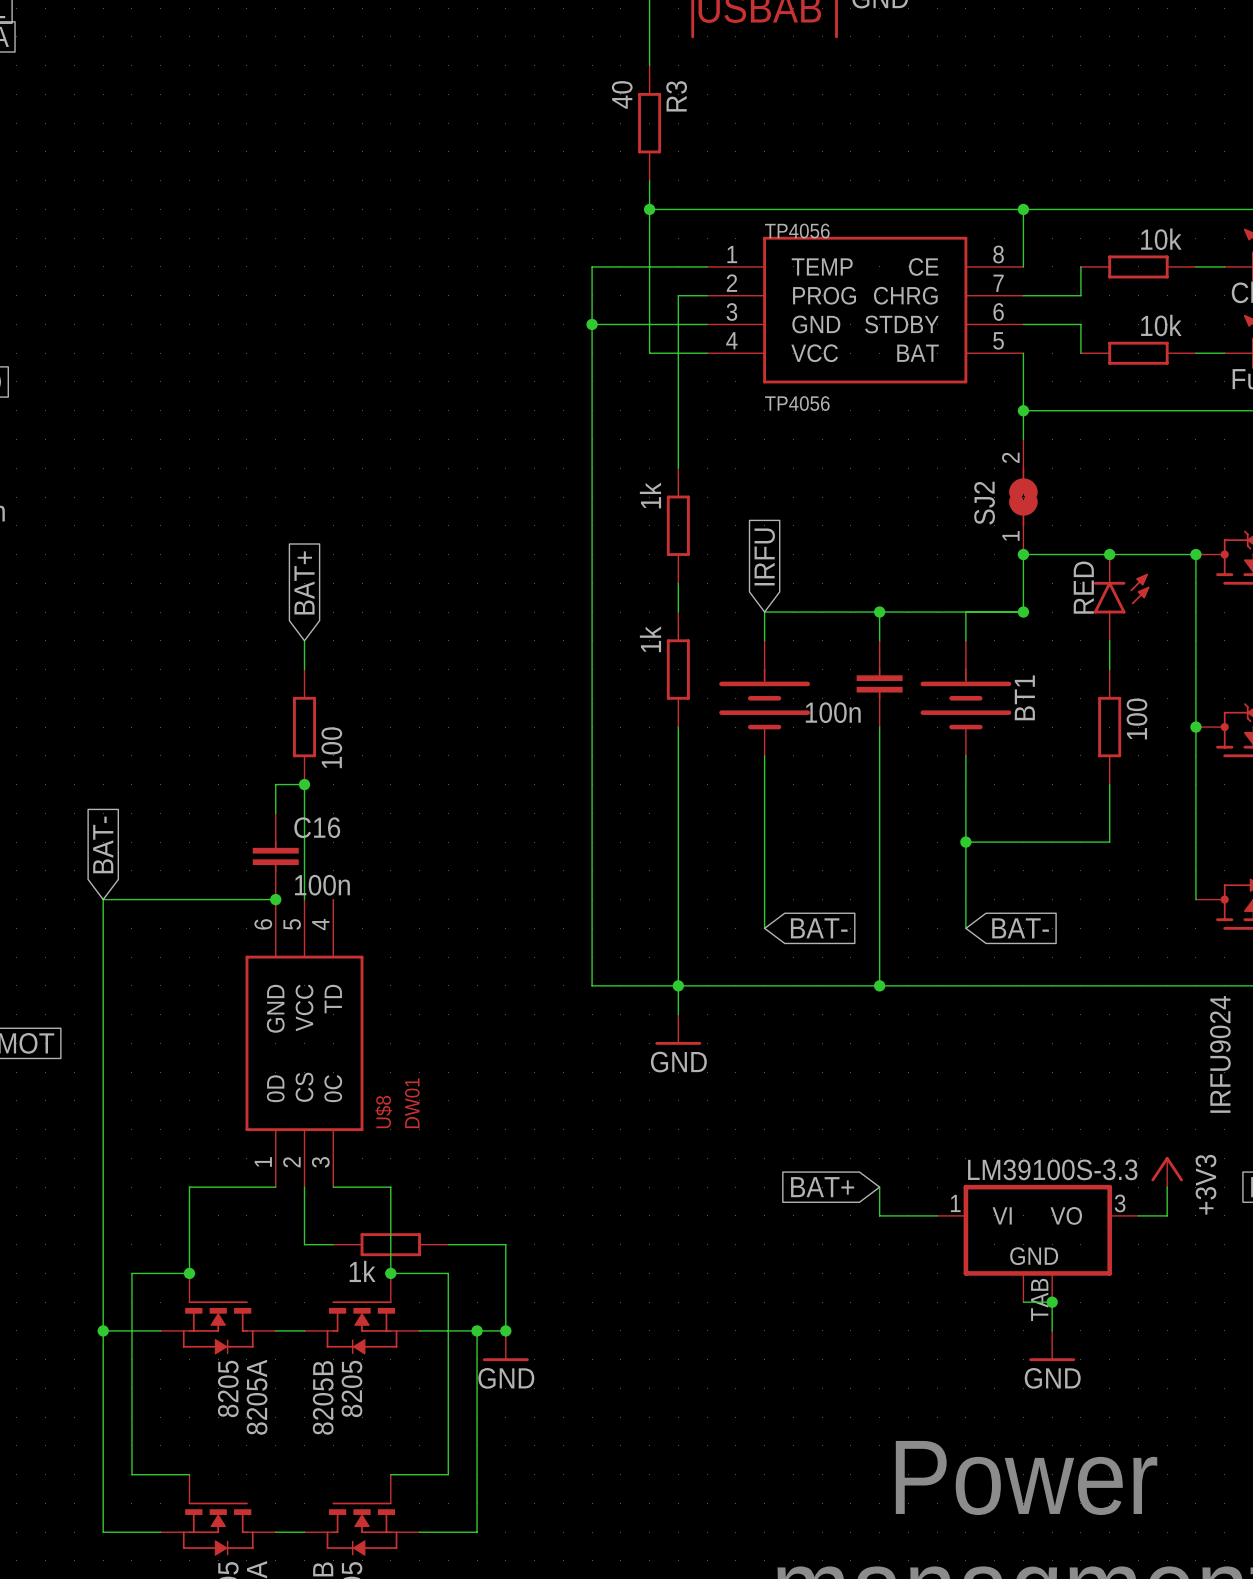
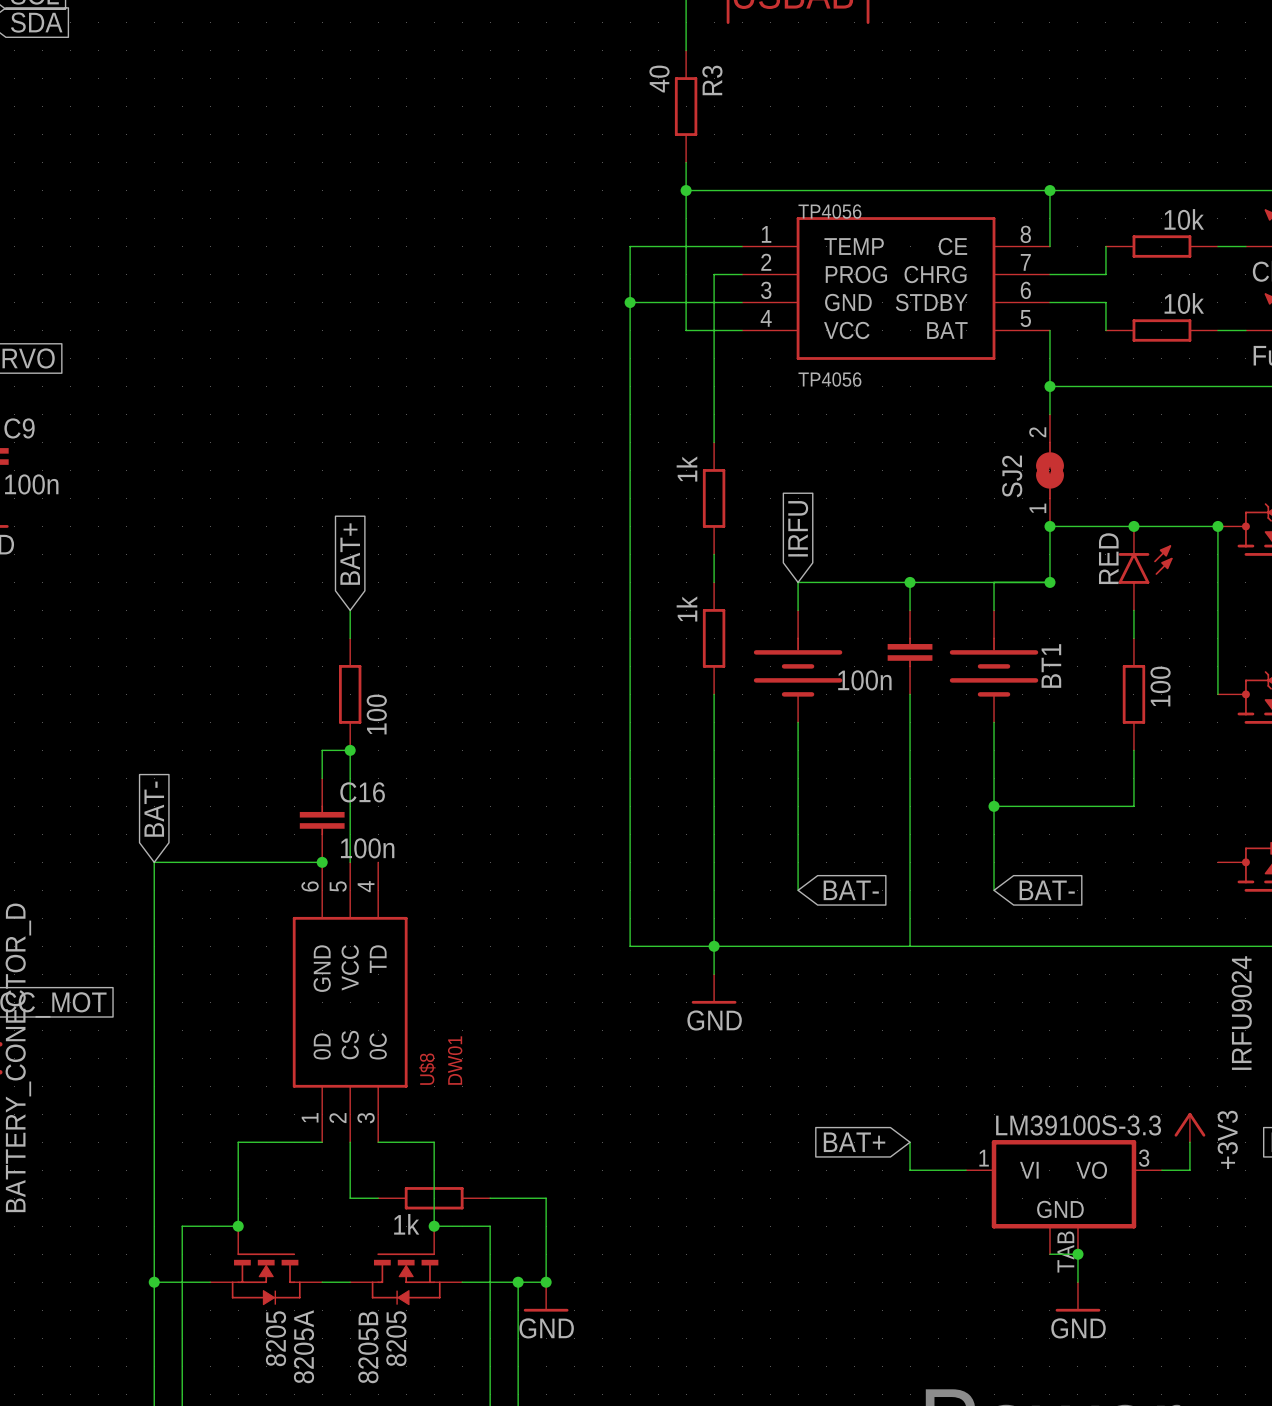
wire: (1195, 727) (1195, 899) -> none
junction: (1195, 727) -> none
junction: (879, 985) -> none

